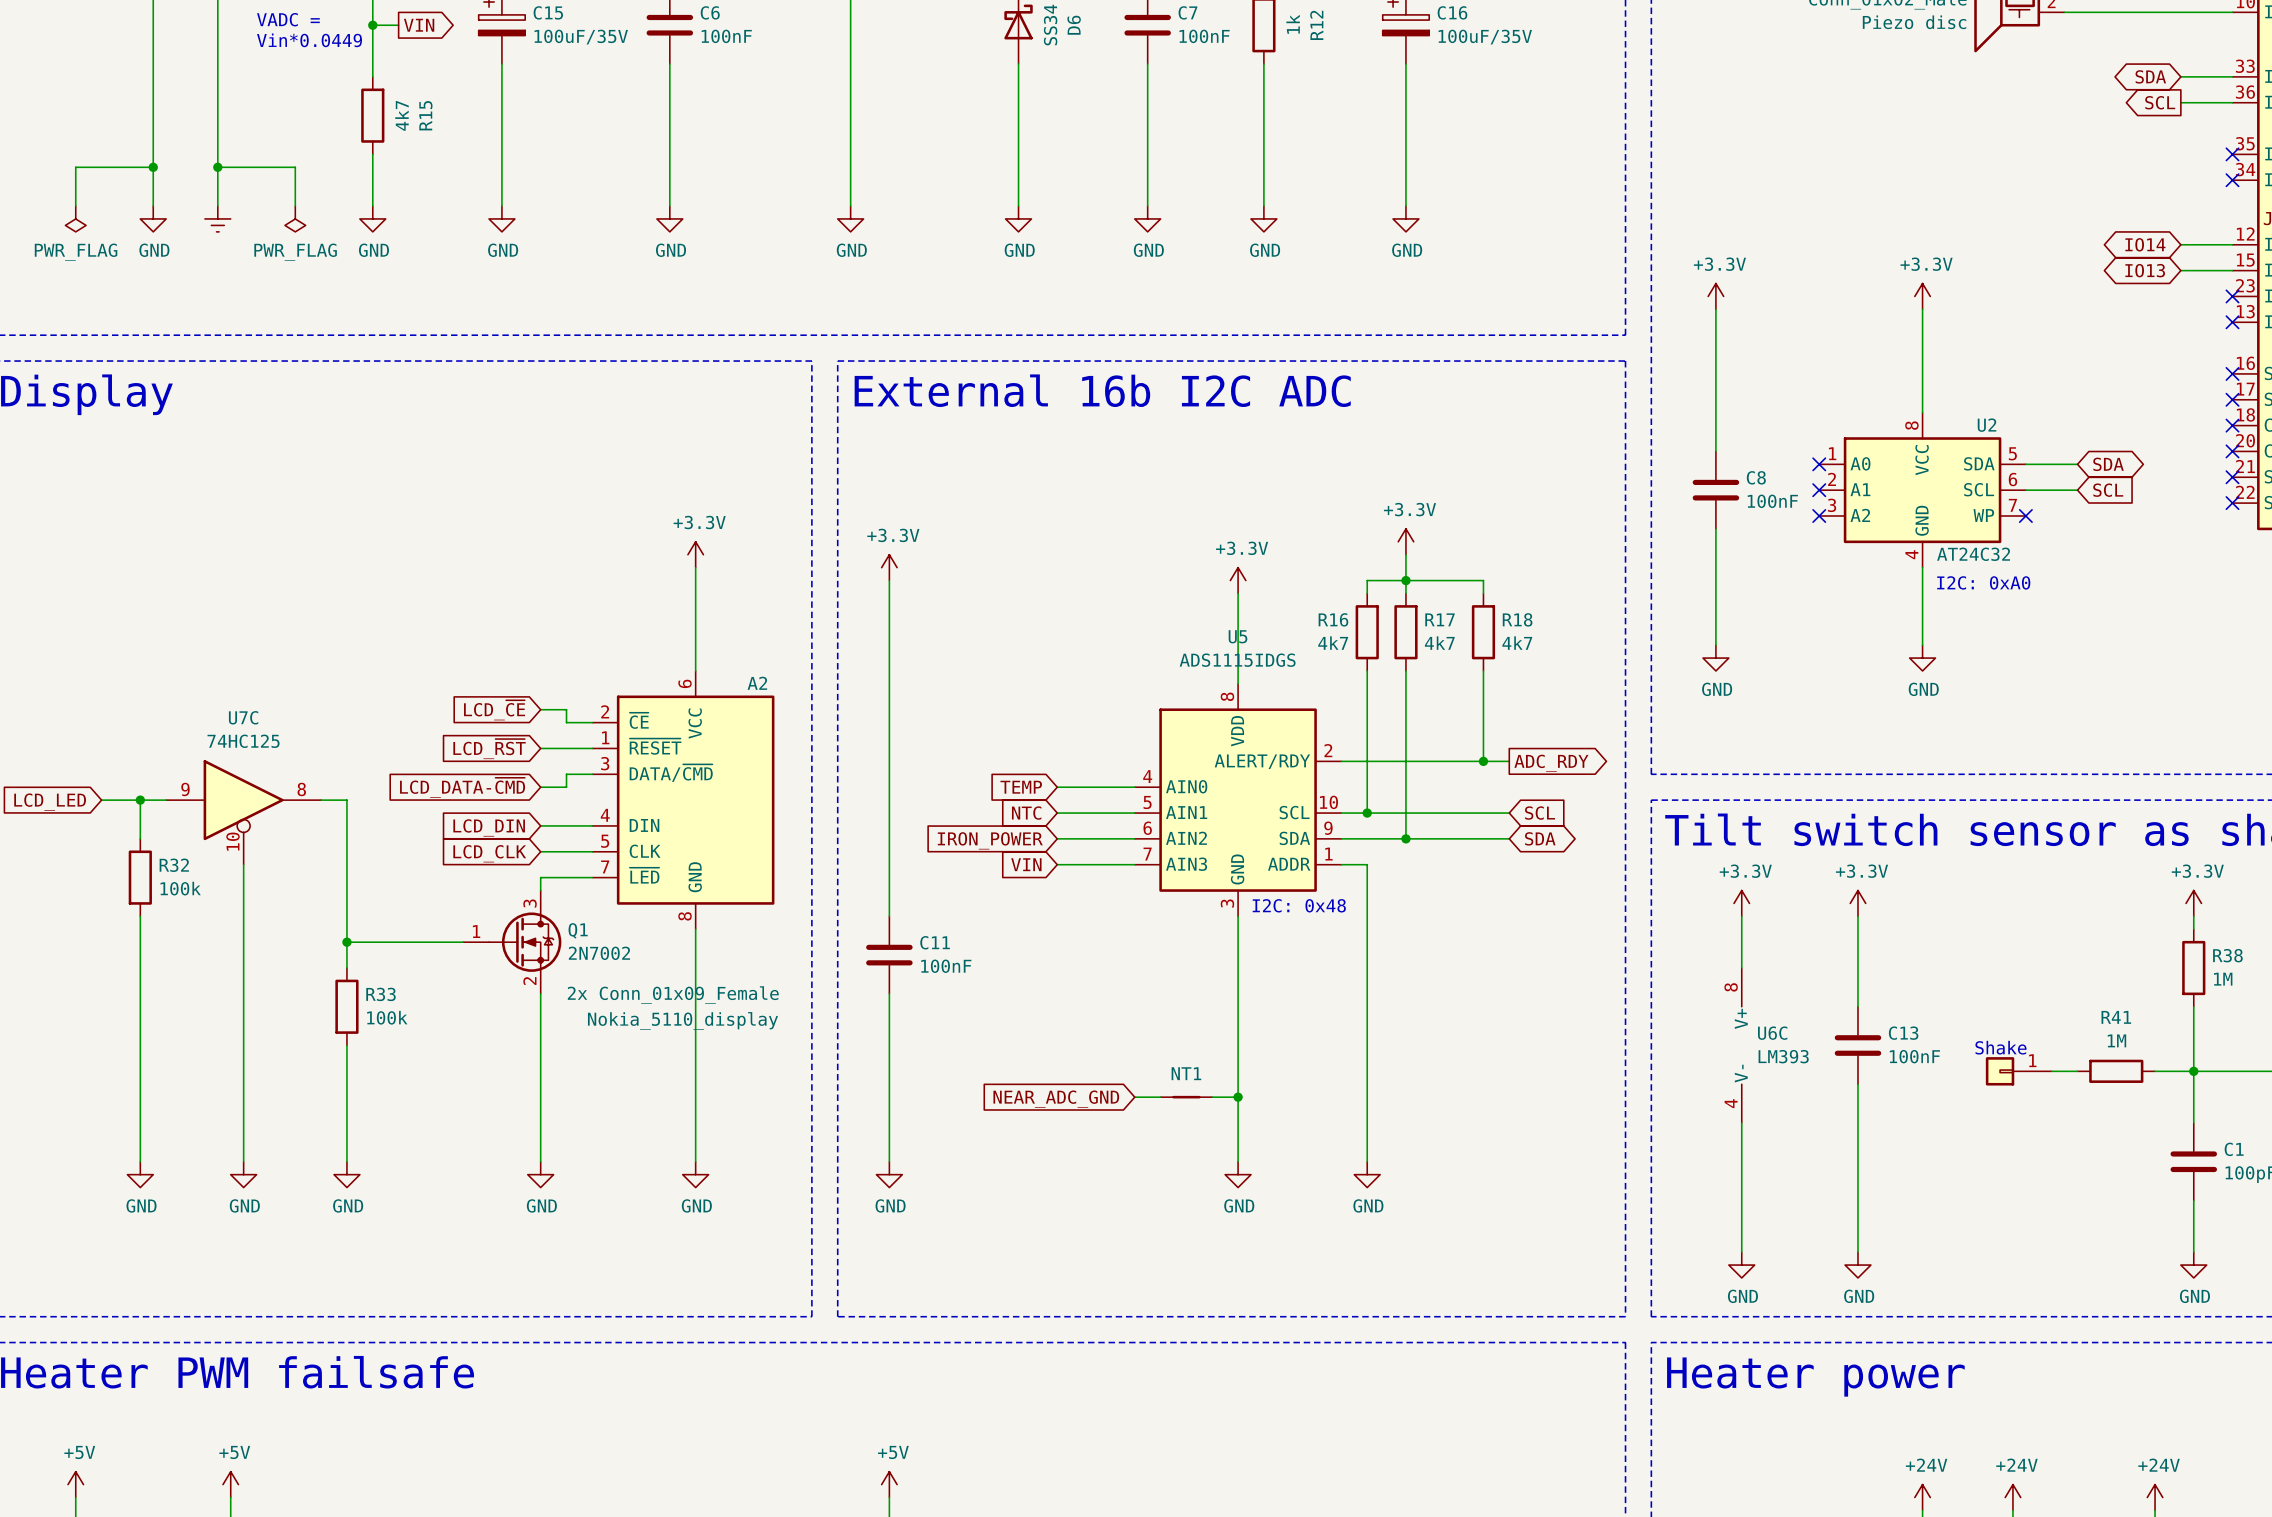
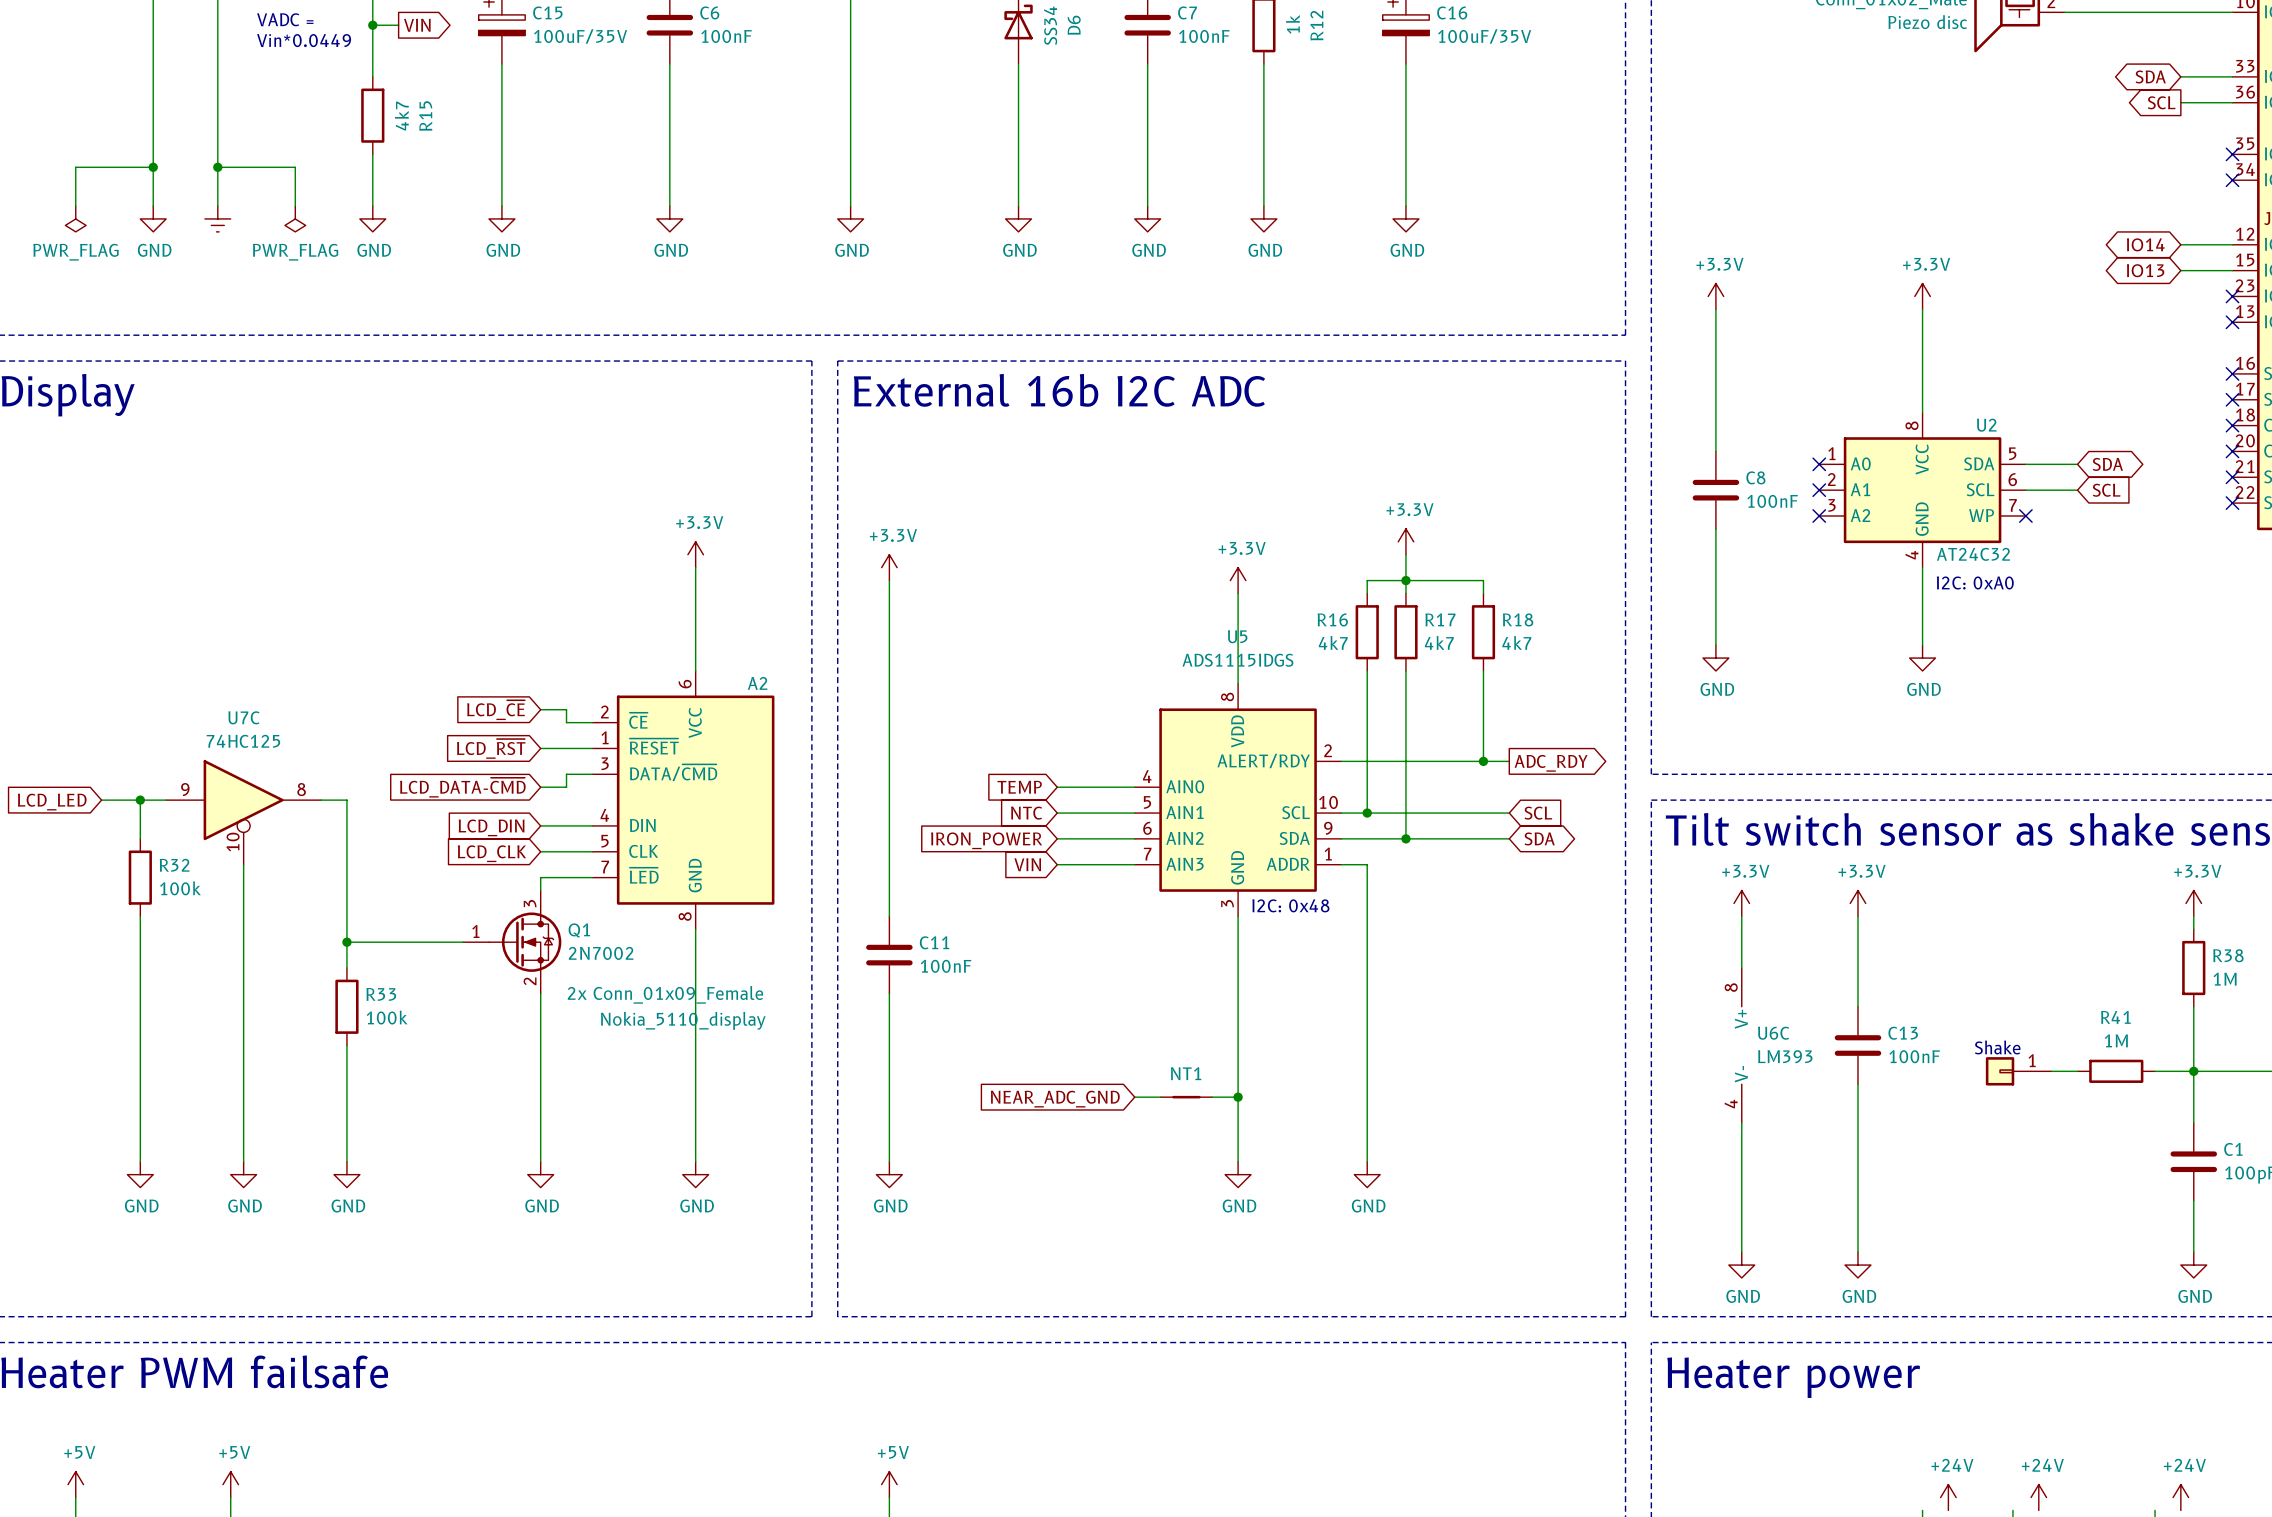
power symbol position: +24V (1922, 1497) -> +24V (1948, 1497)
power symbol position: +24V (2012, 1497) -> +24V (2038, 1497)
power symbol position: +24V (2155, 1497) -> +24V (2180, 1497)

